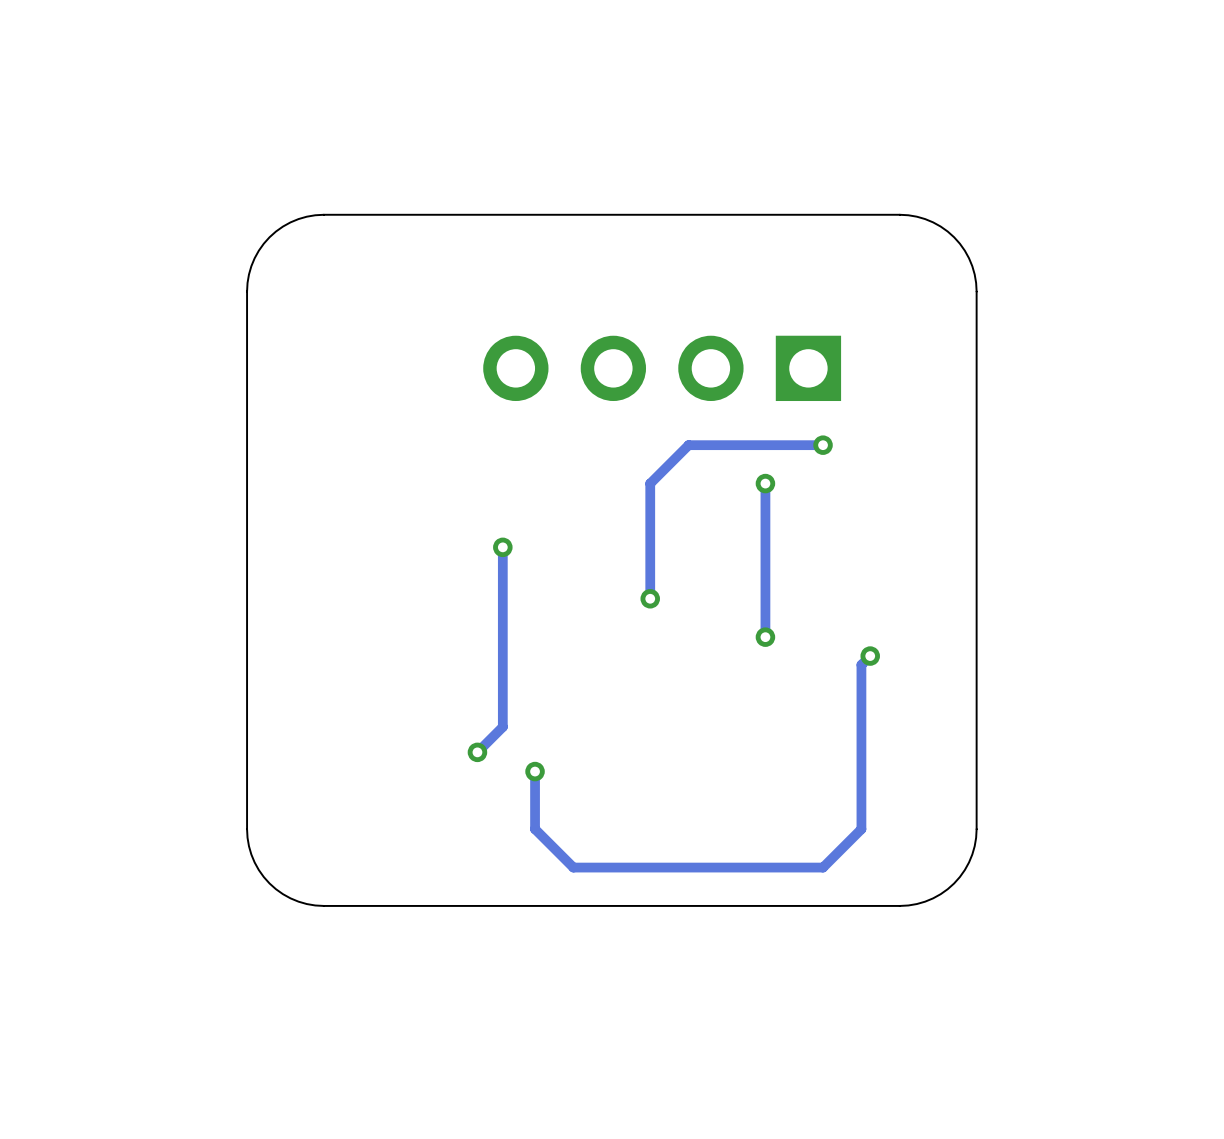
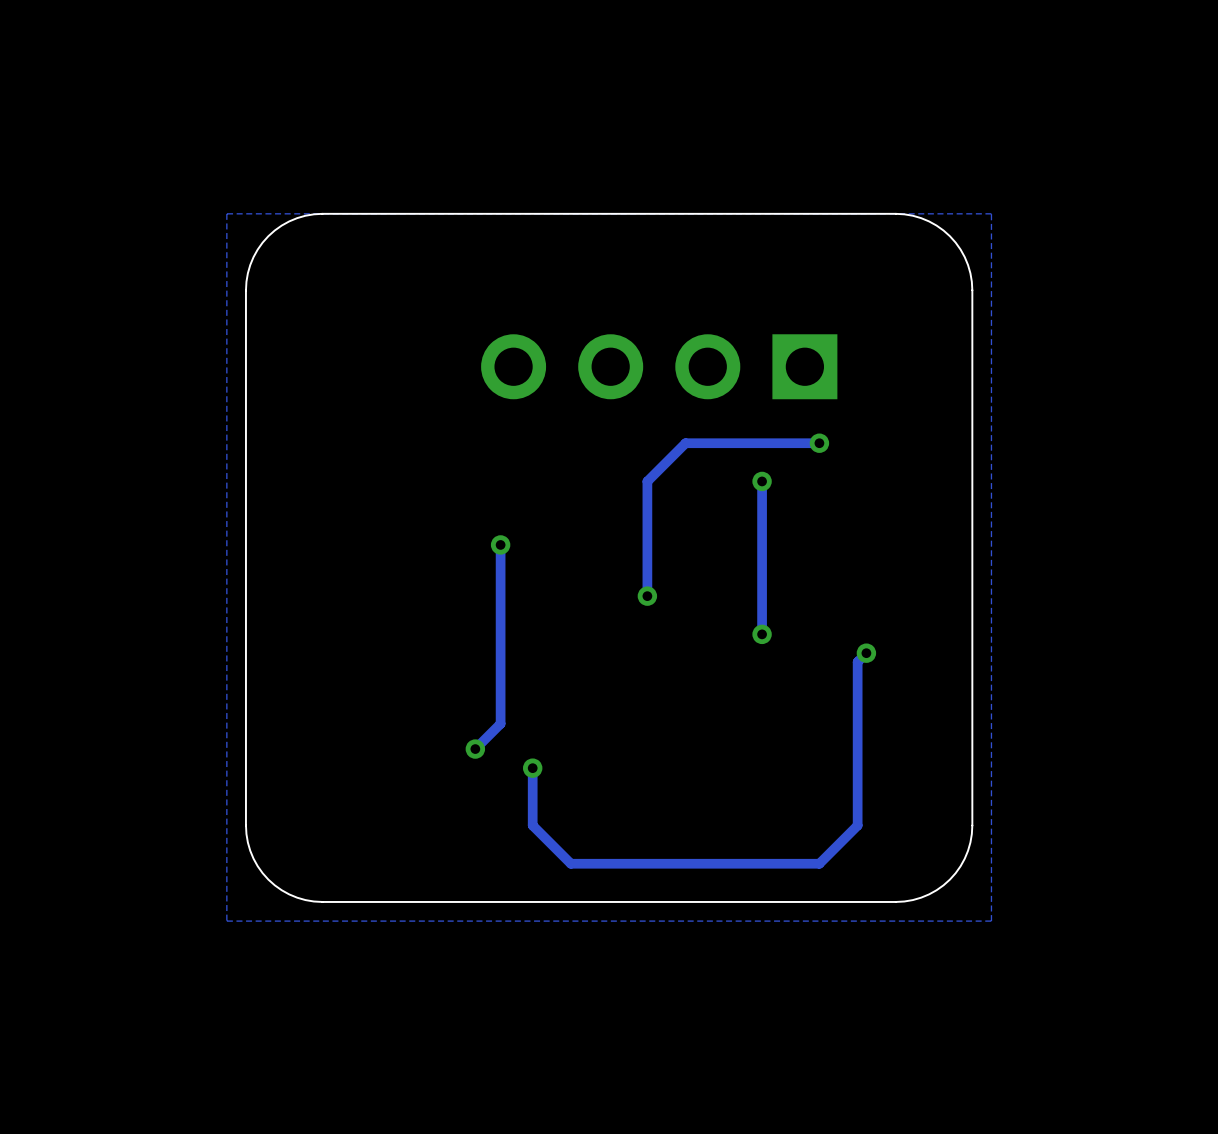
zone outline: none -> (991, 213) (226, 213) (226, 921) (991, 921) (991, 213)

